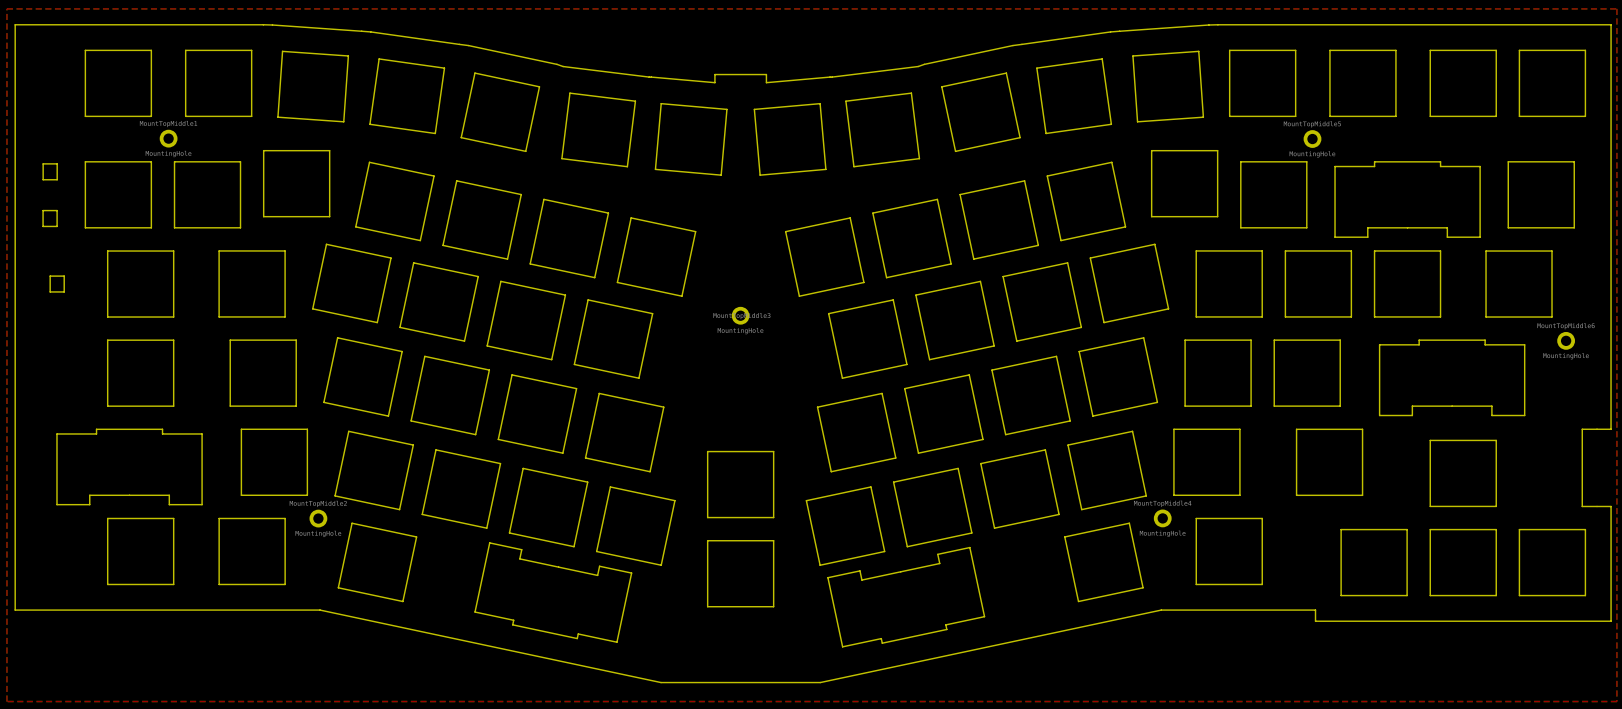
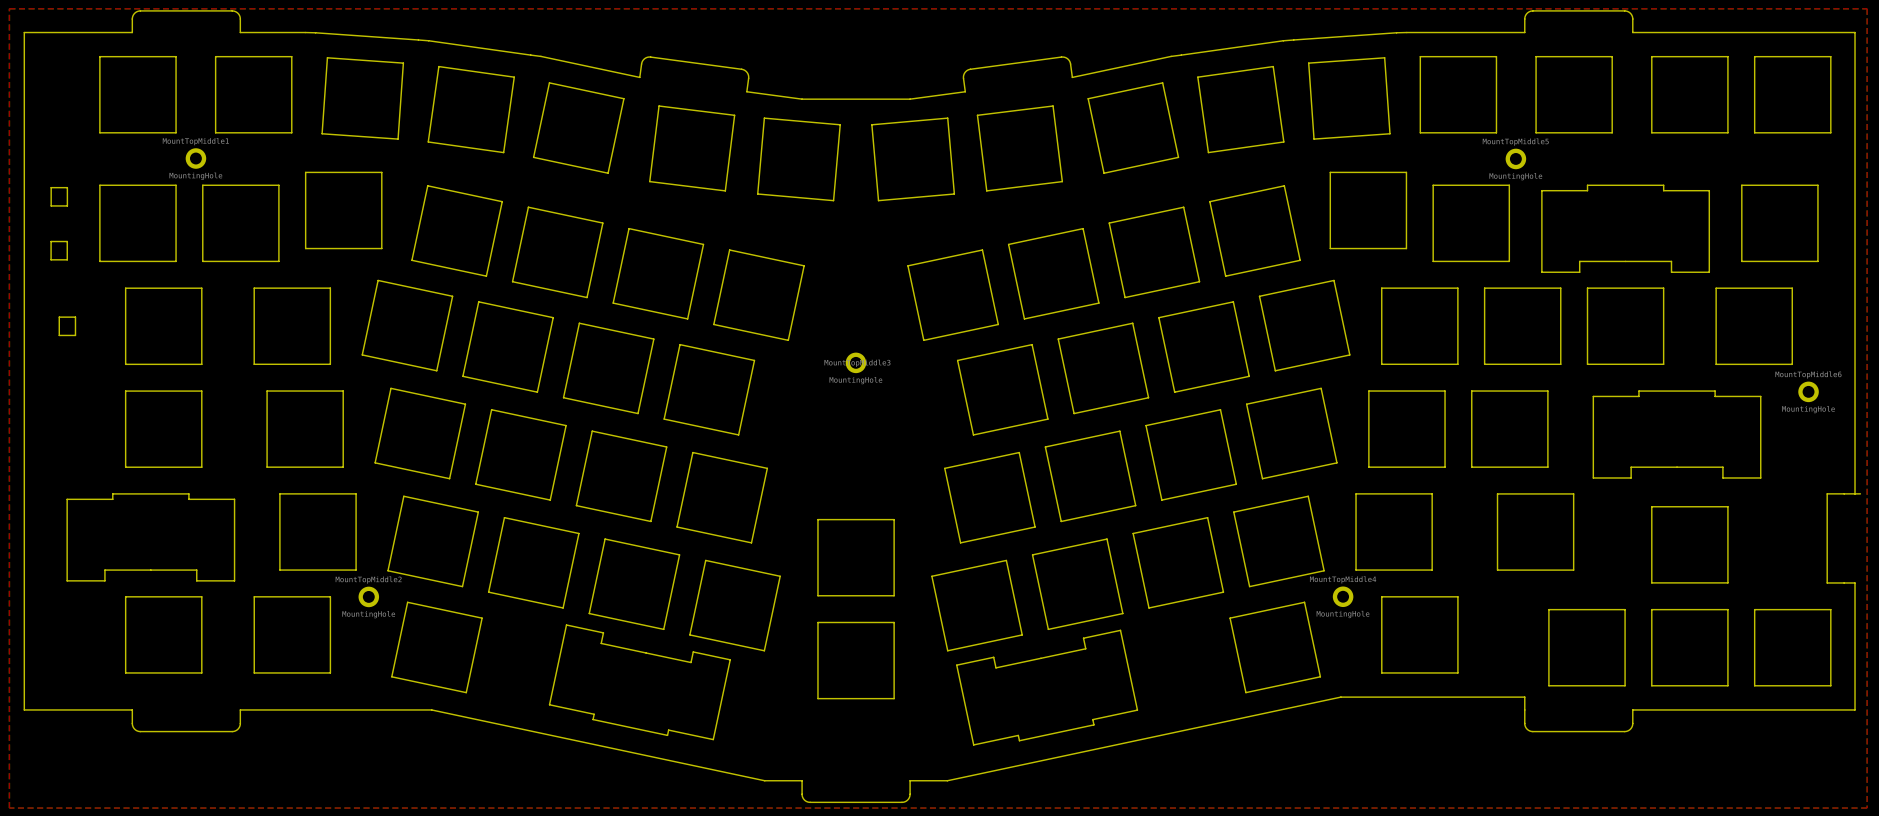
board edge: (1611, 429) (1611, 24) (1208, 25) (1110, 31) (1012, 45) (918, 66) (766, 82) (766, 74) (714, 74) (714, 82) (563, 66) (468, 45) (370, 31) (263, 24) (15, 24) (15, 610) (320, 610) (661, 682) (820, 682) (1161, 610) (1315, 610) (1315, 621) (1611, 621) (1611, 506) (1606, 506) -> (1855, 493) (1855, 32) (1632, 32) (1632, 16) (1626, 11) (1531, 10) (1525, 16) (1524, 32) (1396, 32) (1283, 40) (1171, 56) (1072, 77) (1070, 61) (1063, 57) (970, 69) (963, 75) (965, 91) (910, 99) (802, 99) (746, 91) (748, 76) (743, 69) (650, 57) (642, 61) (639, 77) (540, 56) (428, 40) (315, 32) (240, 32) (240, 16) (233, 10) (138, 11) (132, 16) (132, 32) (24, 32) (24, 709) (132, 709) (132, 726) (140, 731) (234, 731) (240, 725) (240, 709) (431, 709) (764, 780) (802, 780) (802, 796) (809, 802) (903, 802) (909, 796) (910, 780) (947, 780) (1340, 697) (1524, 697) (1525, 725) (1527, 729) (1532, 731) (1626, 731) (1632, 725) (1632, 709) (1855, 709) (1855, 582)

